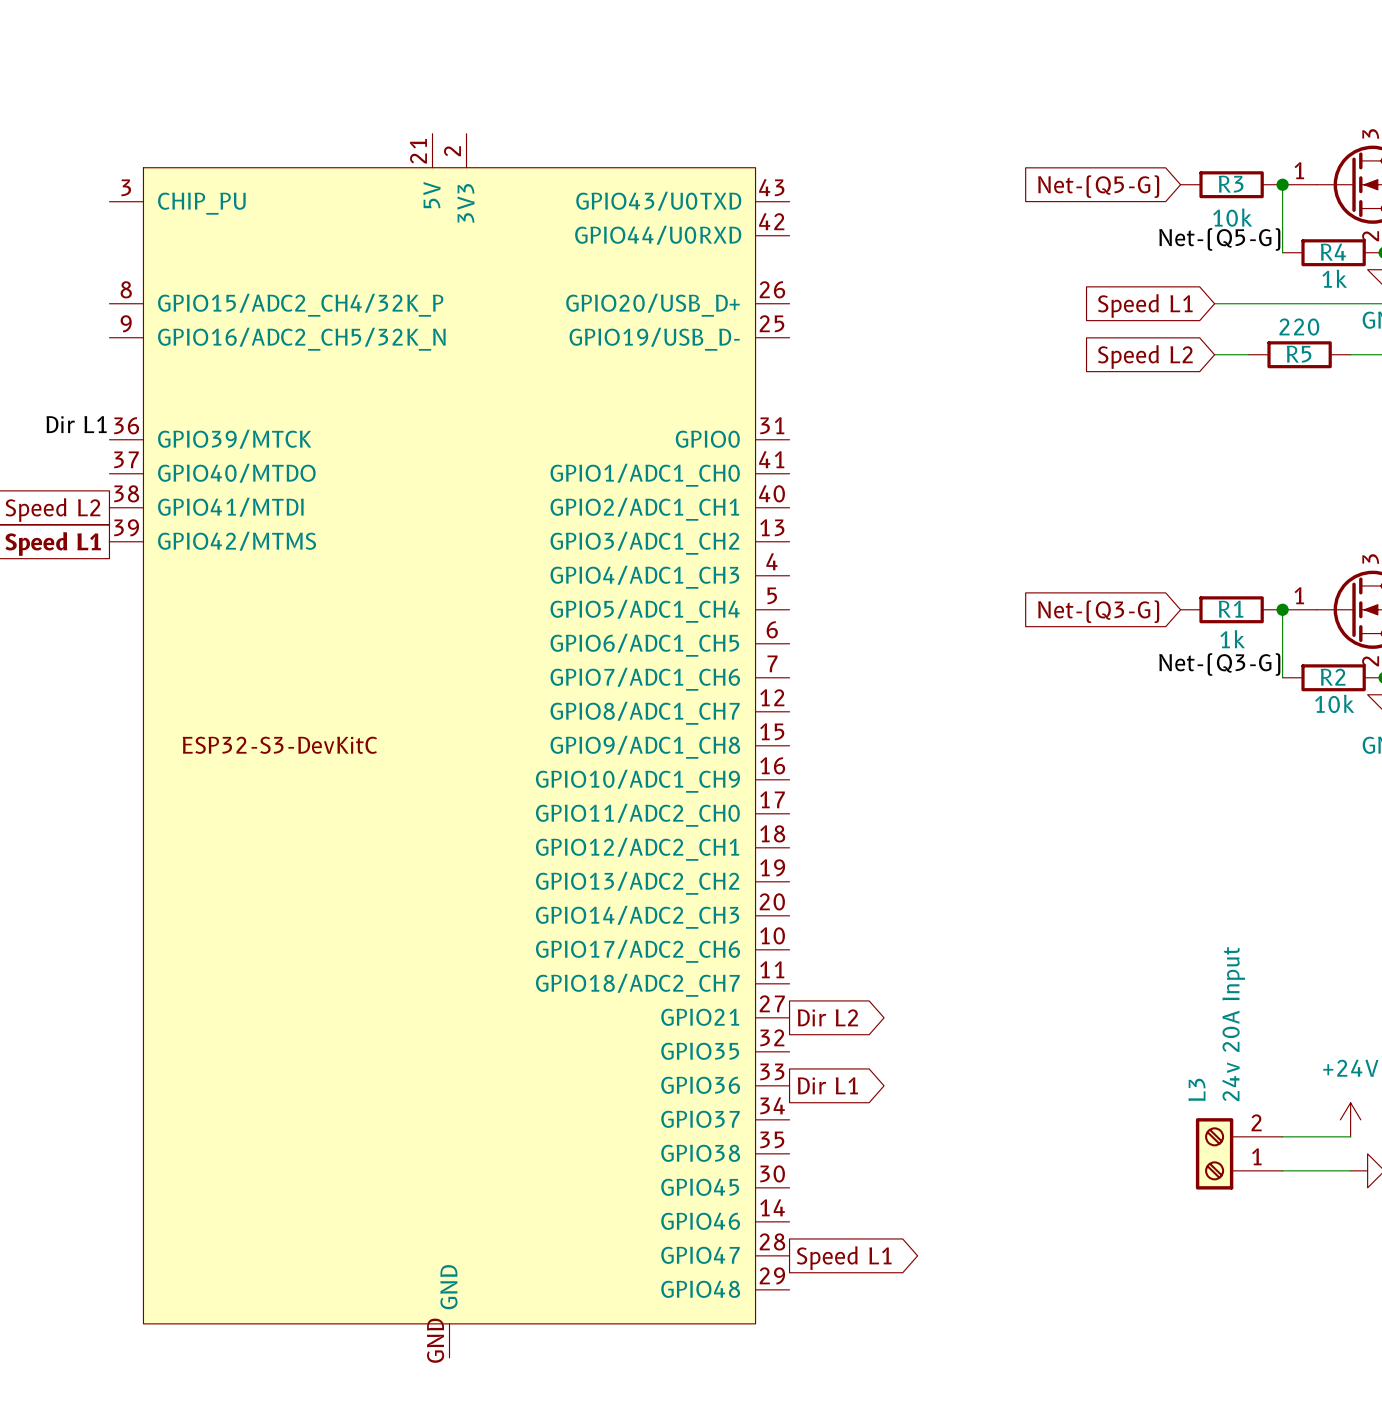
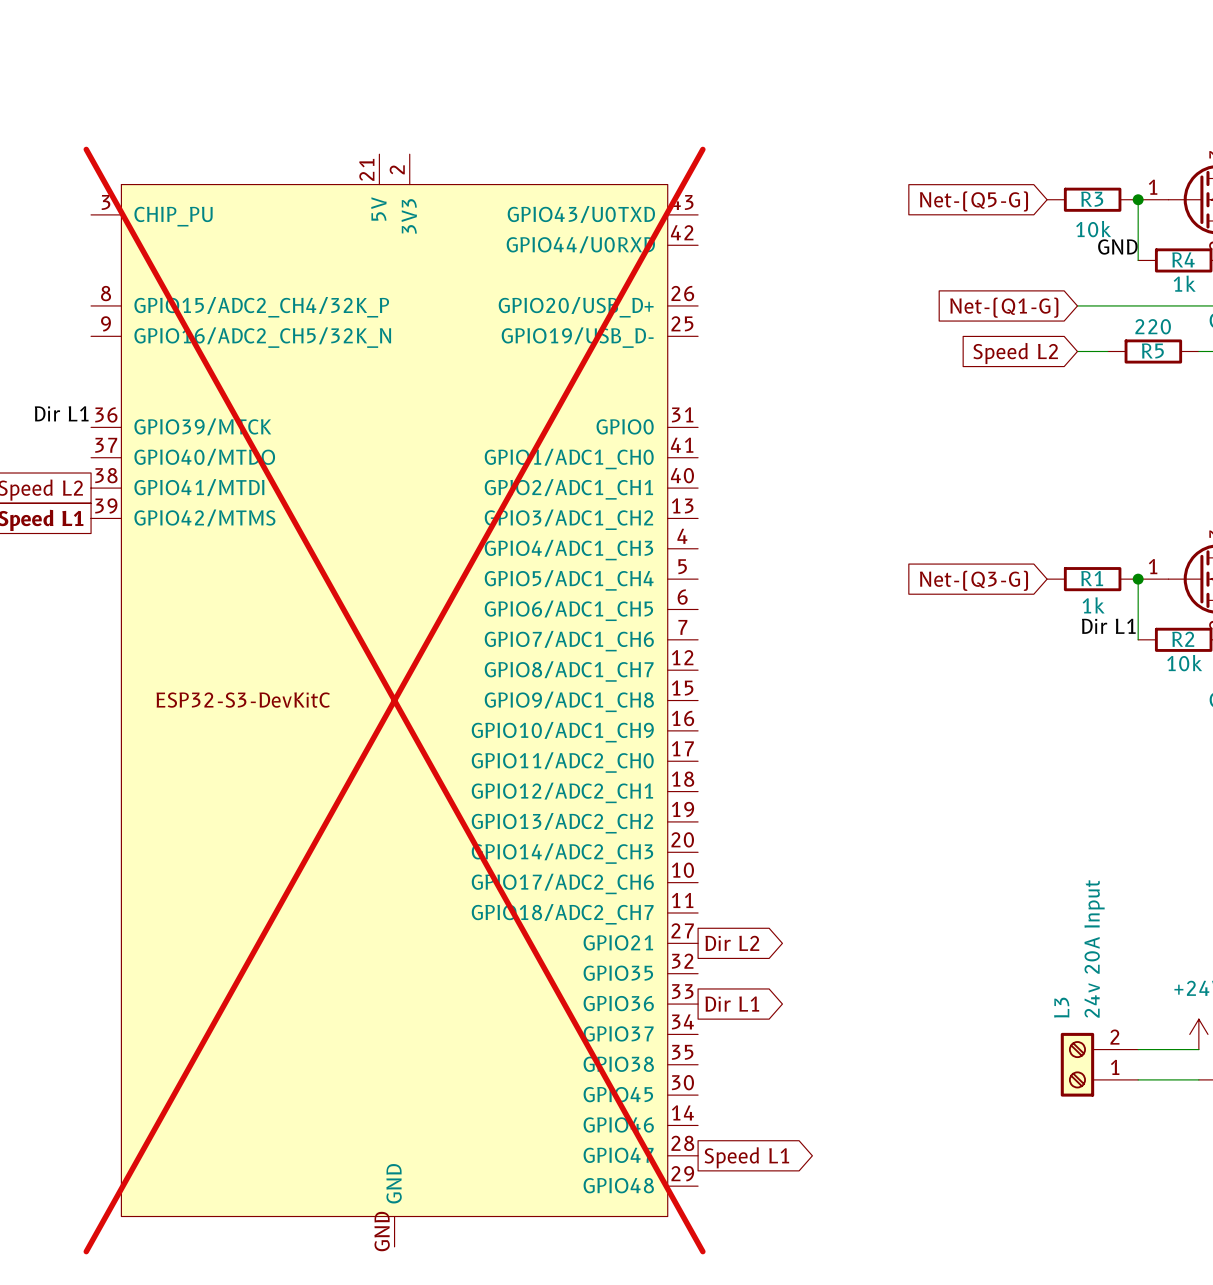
label: Net-(Q5-G) (1219, 239) -> GND (1117, 246)
global label: Speed L1 (1145, 305) -> Net-(Q1-G) (1004, 307)
label: Net-(Q3-G) (1219, 664) -> Dir L1 (1108, 626)
part do-not-place cross: none -> (394, 700)

